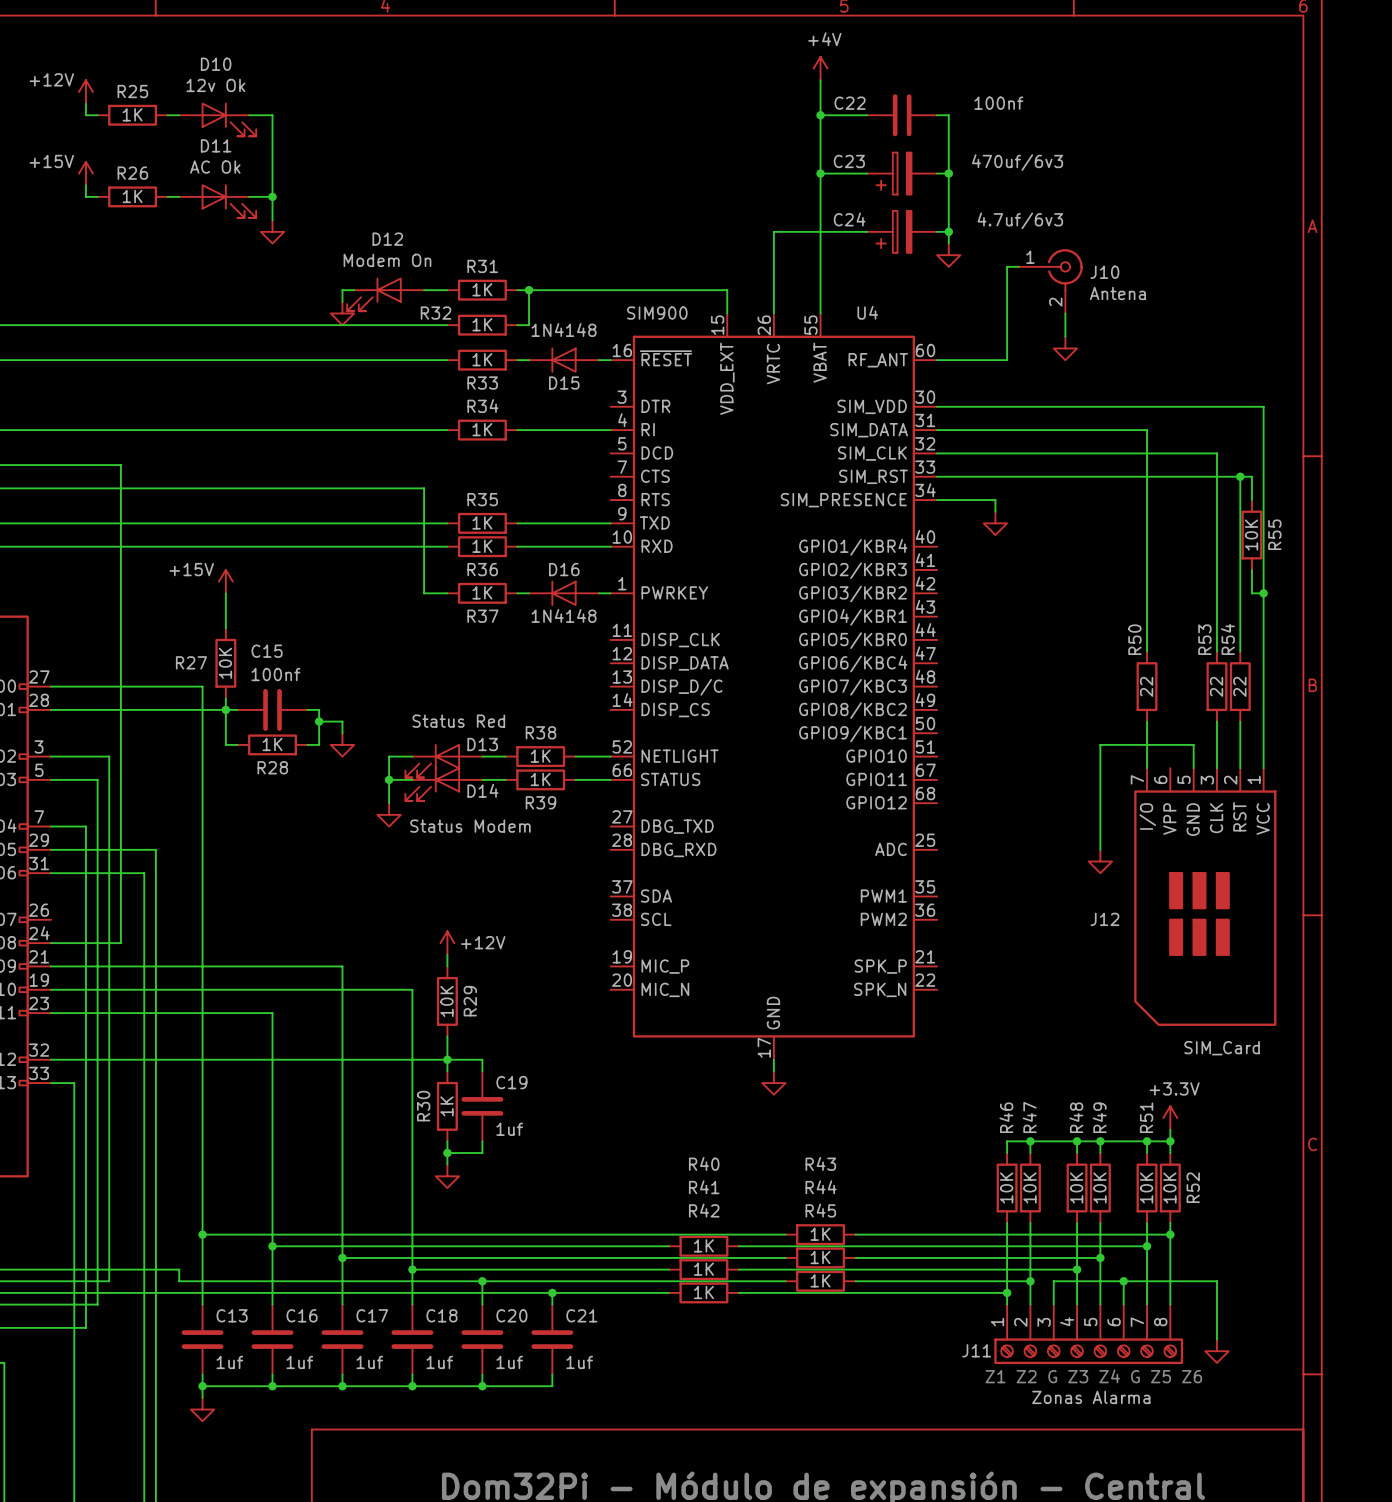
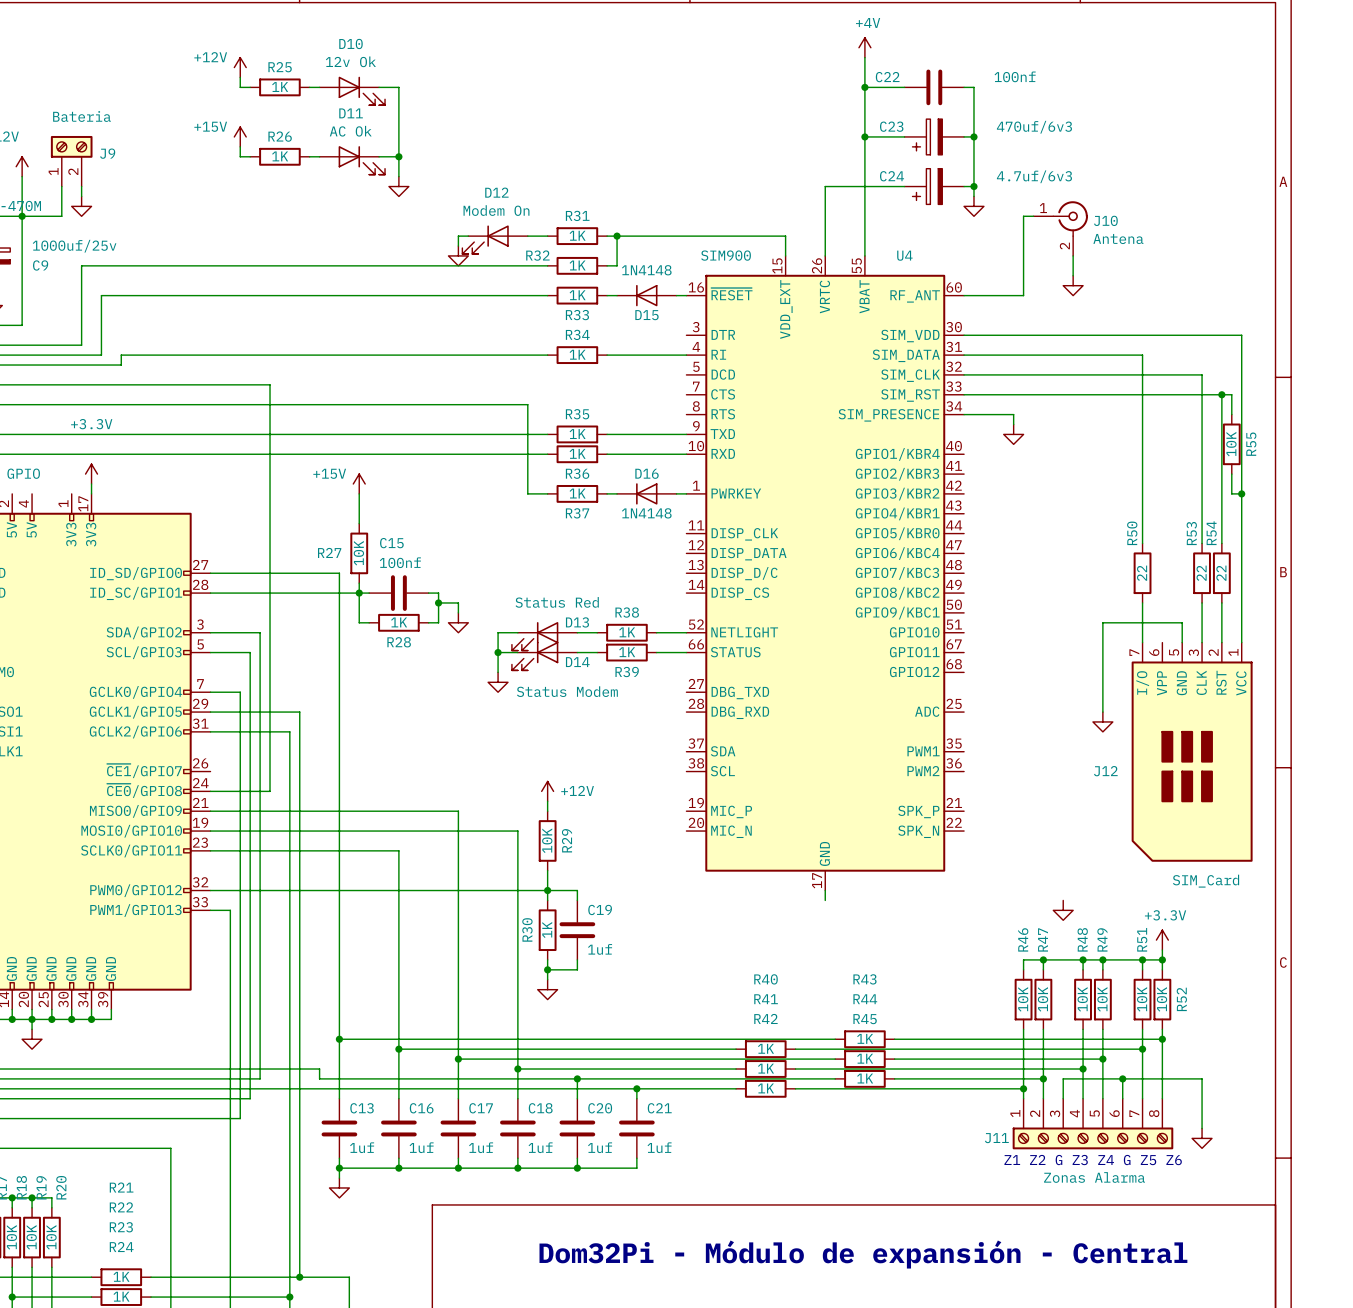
power symbol: (773, 1083) -> none
power symbol: none -> (1063, 910)

